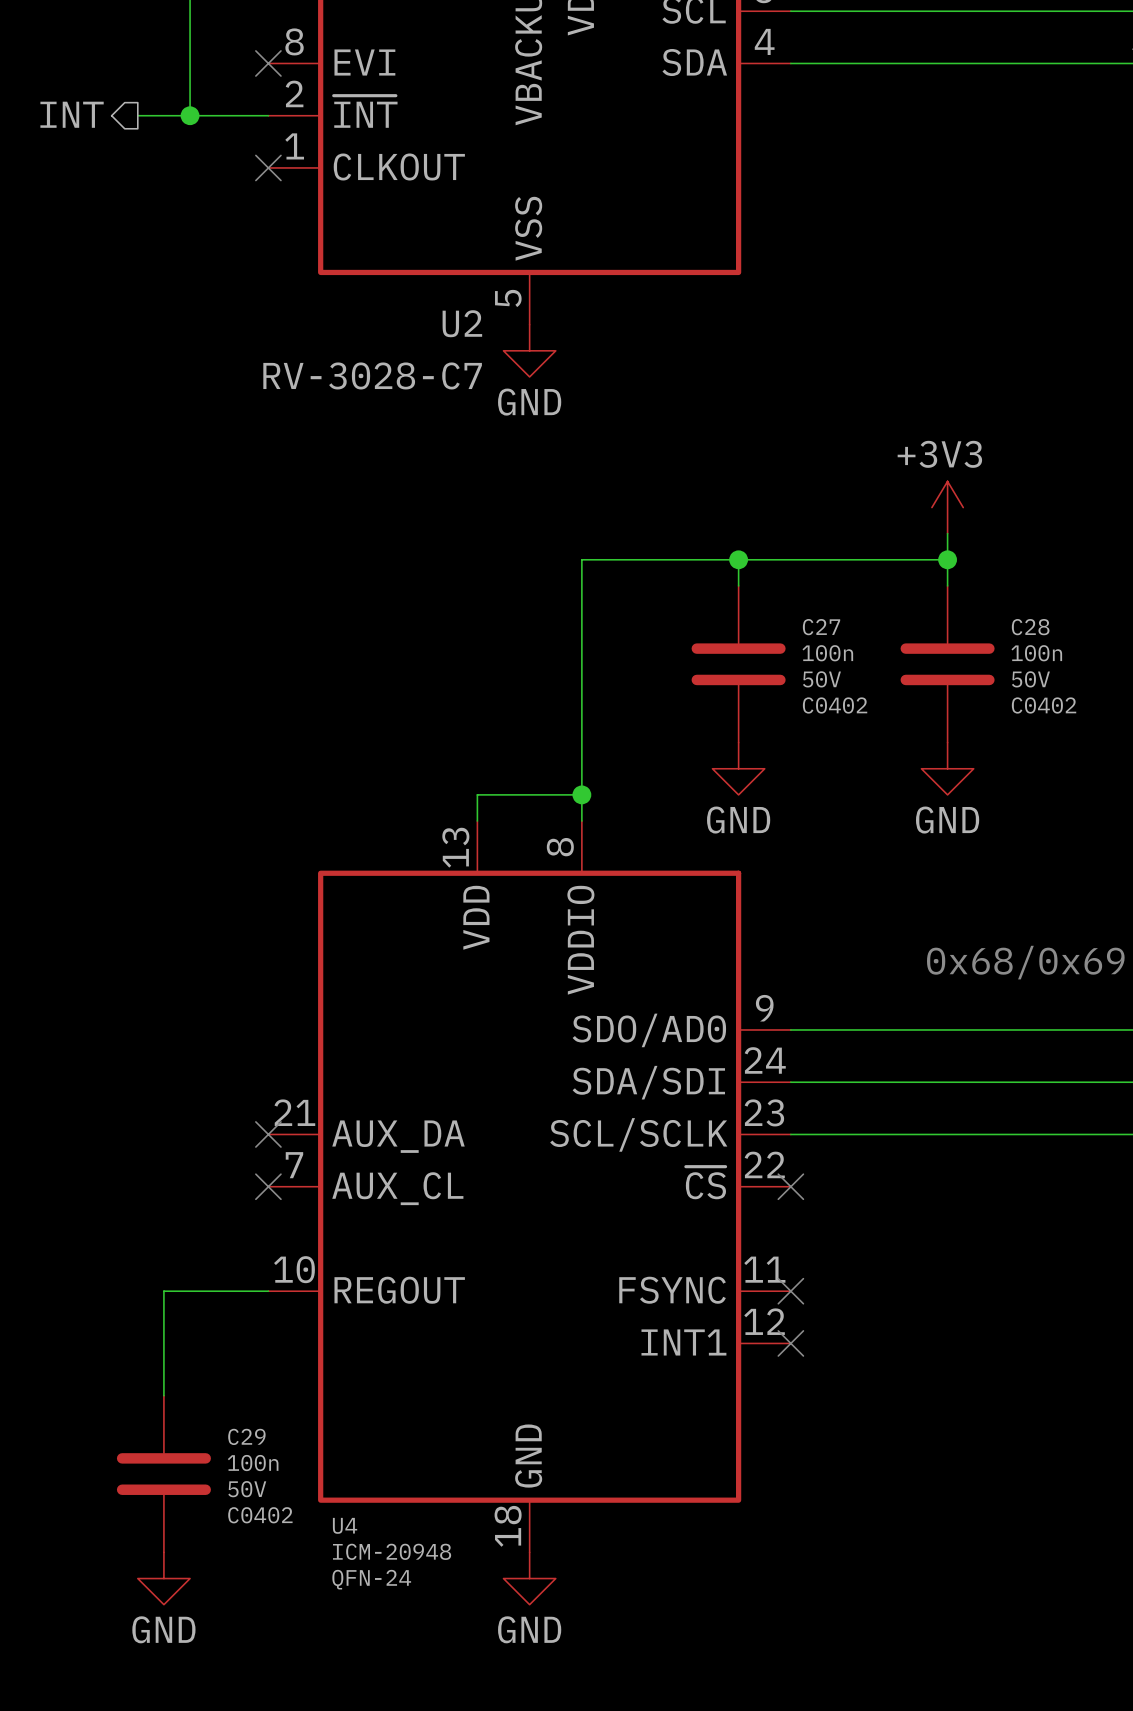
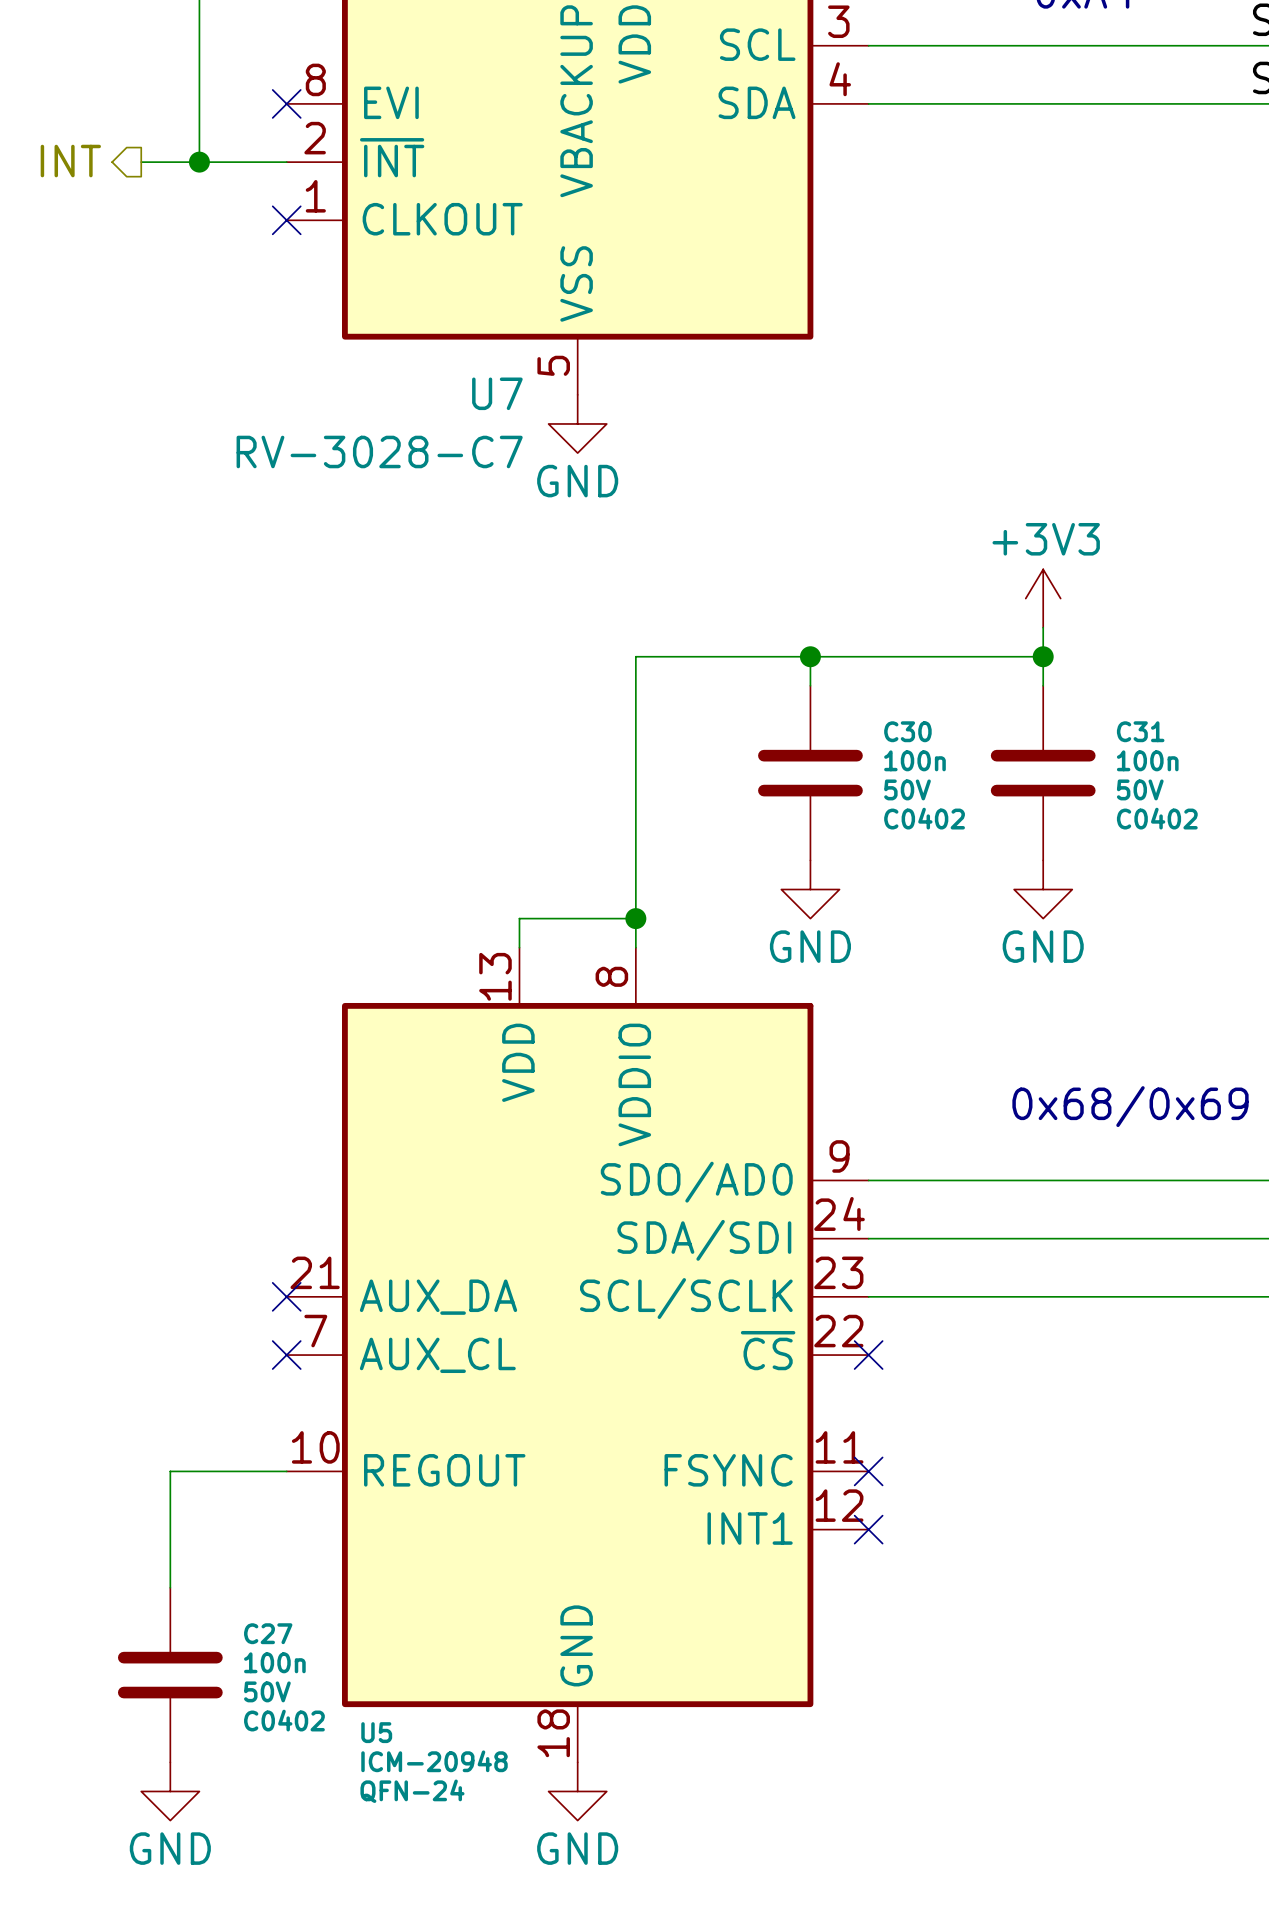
U2 name: U2 (462, 323) -> U7 (497, 393)
C27 name: C27 (821, 627) -> C30 (907, 731)
C28 name: C28 (1030, 627) -> C31 (1140, 731)
C29 name: C29 (246, 1436) -> C27 (268, 1633)
U4 name: U4 (345, 1525) -> U5 (376, 1732)

